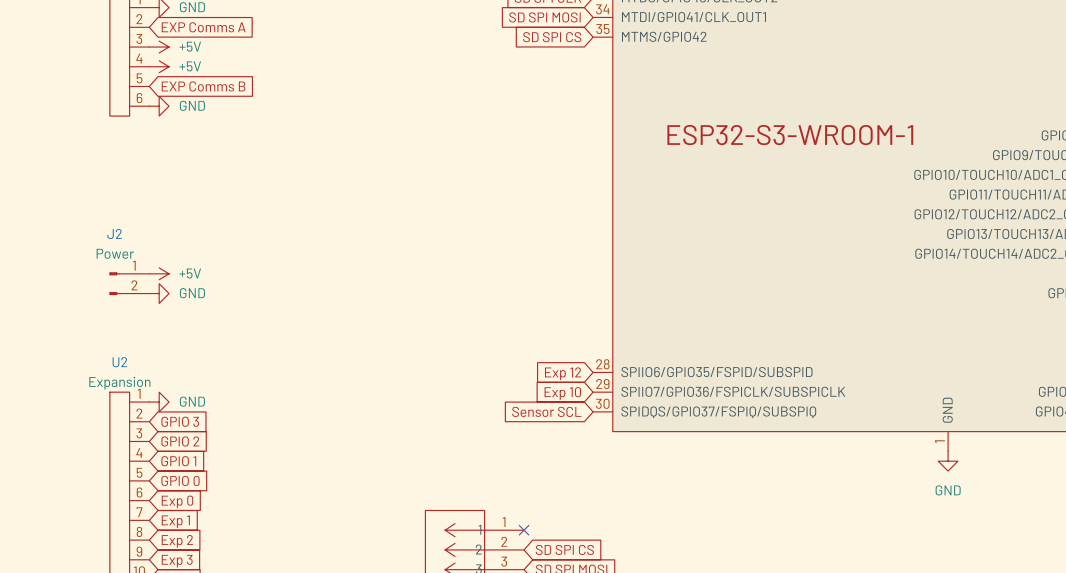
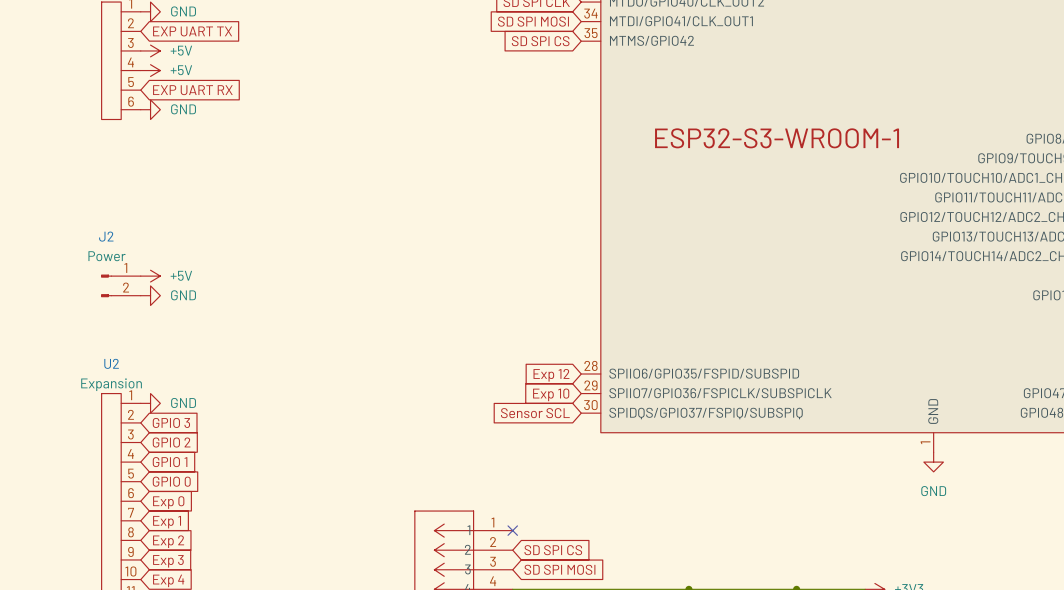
global label: EXP Comms A (203, 27) -> EXP UART TX (192, 31)
global label: EXP Comms B (203, 86) -> EXP UART RX (192, 90)

